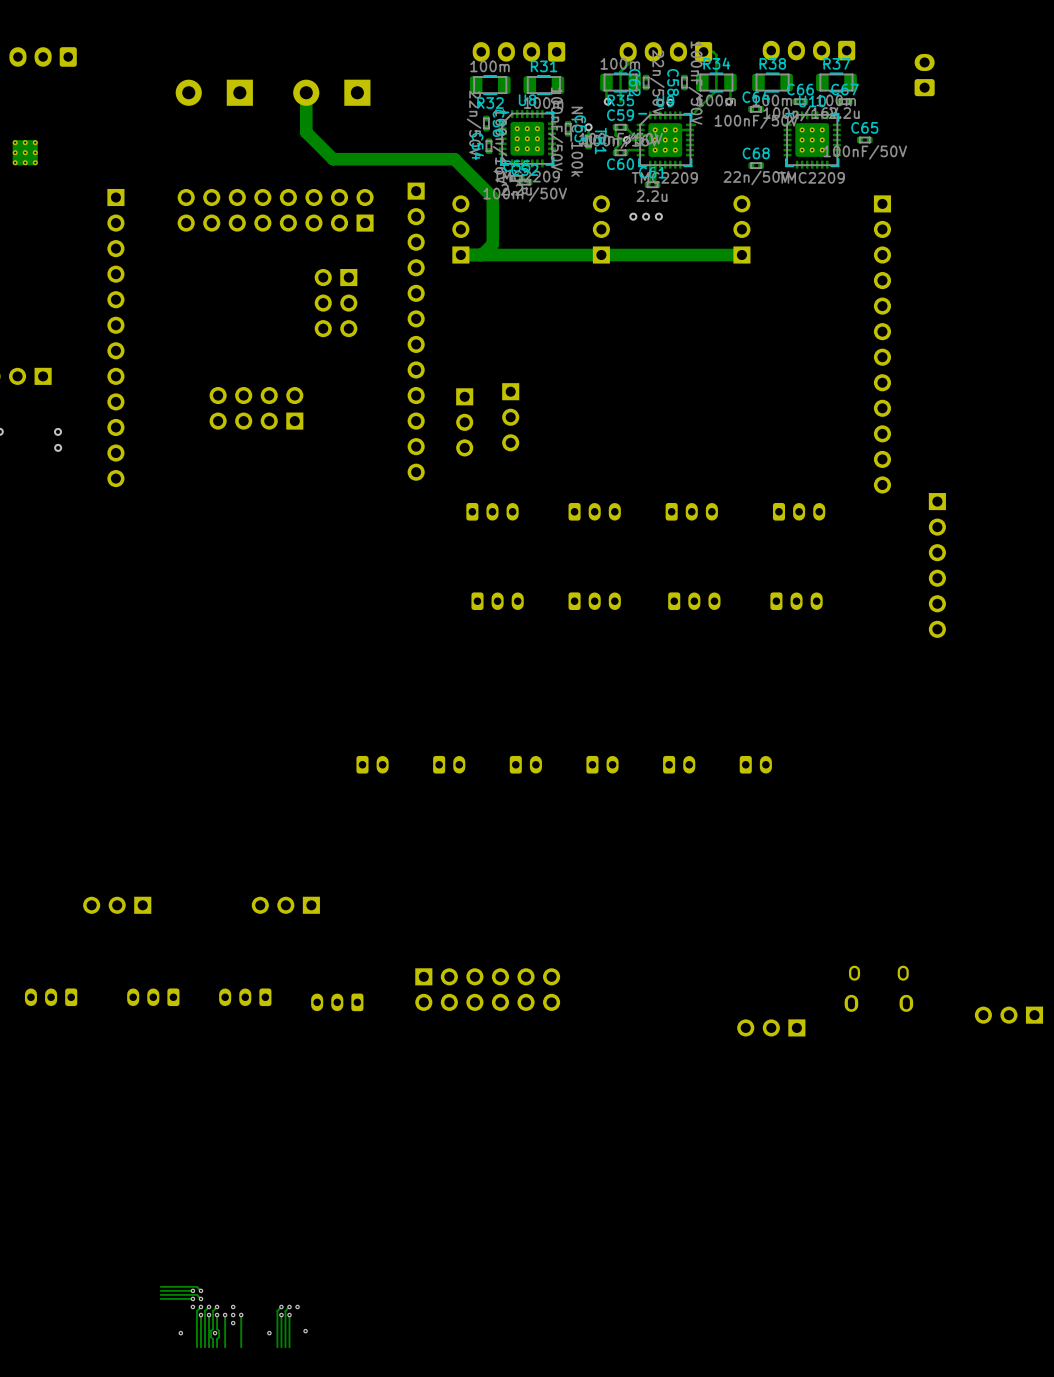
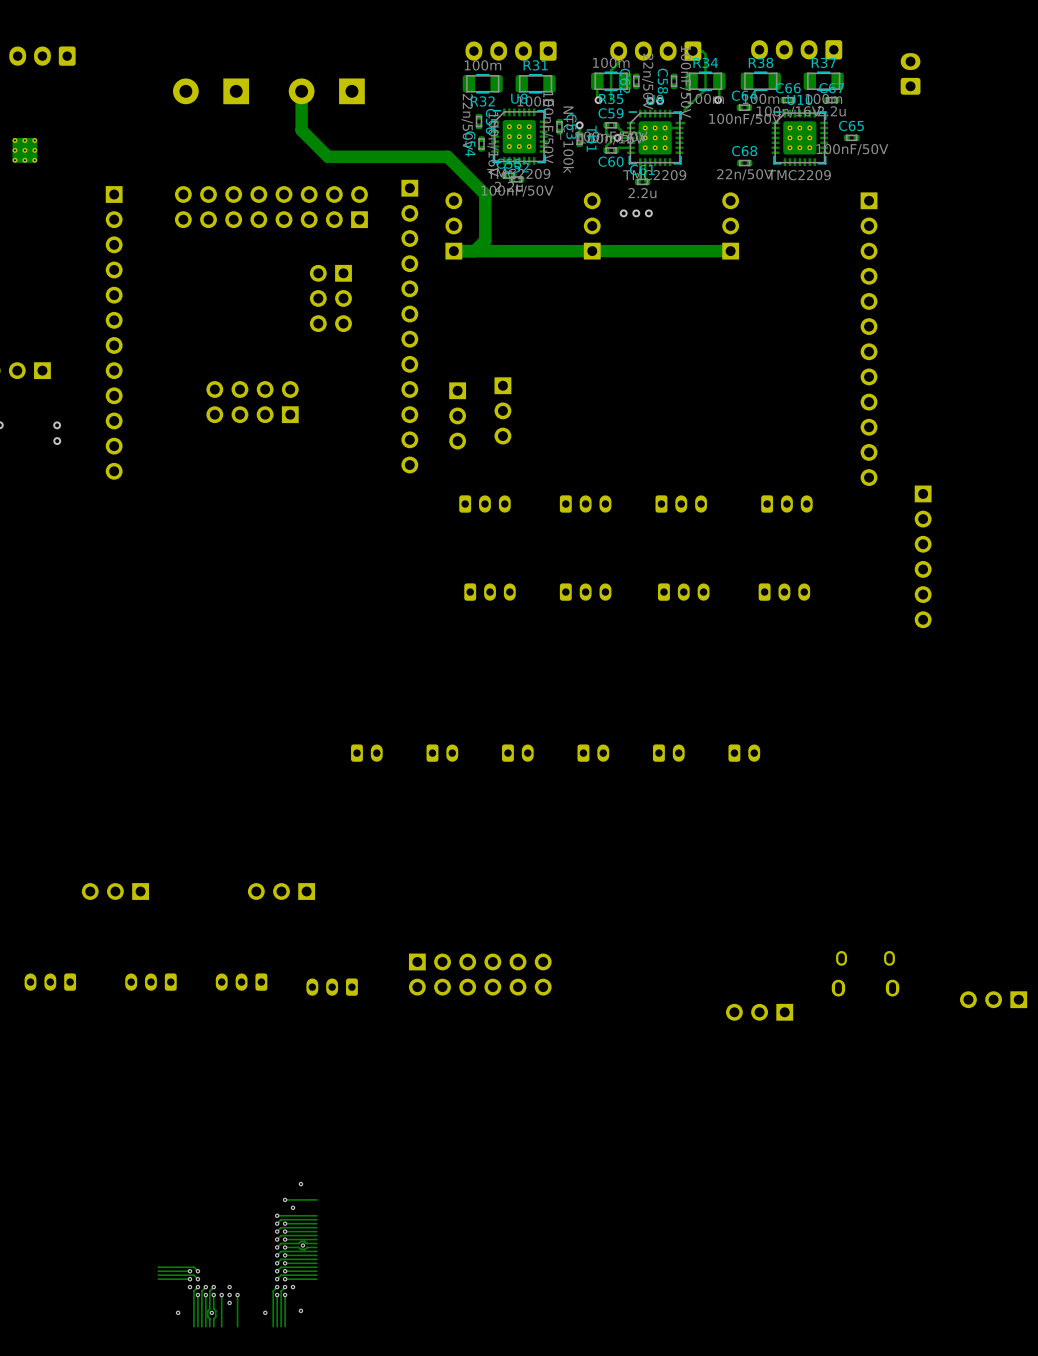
via: none -> (300, 1184)
via: none -> (285, 1199)
track: none -> (316, 1199) (285, 1199)
via: none -> (293, 1207)
via: none -> (277, 1215)
track: none -> (316, 1215) (277, 1215)
track: none -> (316, 1219) (281, 1219) (277, 1223)
via: none -> (277, 1223)
via: none -> (285, 1223)
track: none -> (316, 1223) (285, 1223)
track: none -> (316, 1227) (281, 1227) (277, 1231)
via: none -> (277, 1231)
via: none -> (285, 1231)
track: none -> (316, 1231) (285, 1231)
track: none -> (316, 1235) (281, 1235) (277, 1239)
via: none -> (277, 1239)
via: none -> (285, 1239)
track: none -> (316, 1239) (285, 1239)
track: none -> (316, 1243) (300, 1241) (298, 1243) (281, 1243) (277, 1247)
via: none -> (302, 1245)
via: none -> (277, 1247)
via: none -> (285, 1247)
track: none -> (316, 1247) (306, 1247) (304, 1249) (285, 1247)
track: none -> (316, 1251) (281, 1251) (277, 1255)
via: none -> (277, 1255)
via: none -> (285, 1255)
track: none -> (316, 1255) (285, 1255)
track: none -> (316, 1259) (281, 1259) (277, 1263)
via: none -> (277, 1263)
via: none -> (285, 1263)
track: none -> (316, 1263) (285, 1263)
track: none -> (316, 1267) (281, 1267) (277, 1271)
via: none -> (277, 1271)
via: none -> (285, 1271)
track: none -> (316, 1271) (285, 1271)
track: none -> (316, 1275) (281, 1275) (277, 1279)
via: none -> (277, 1279)
via: none -> (285, 1279)
track: none -> (316, 1279) (285, 1279)

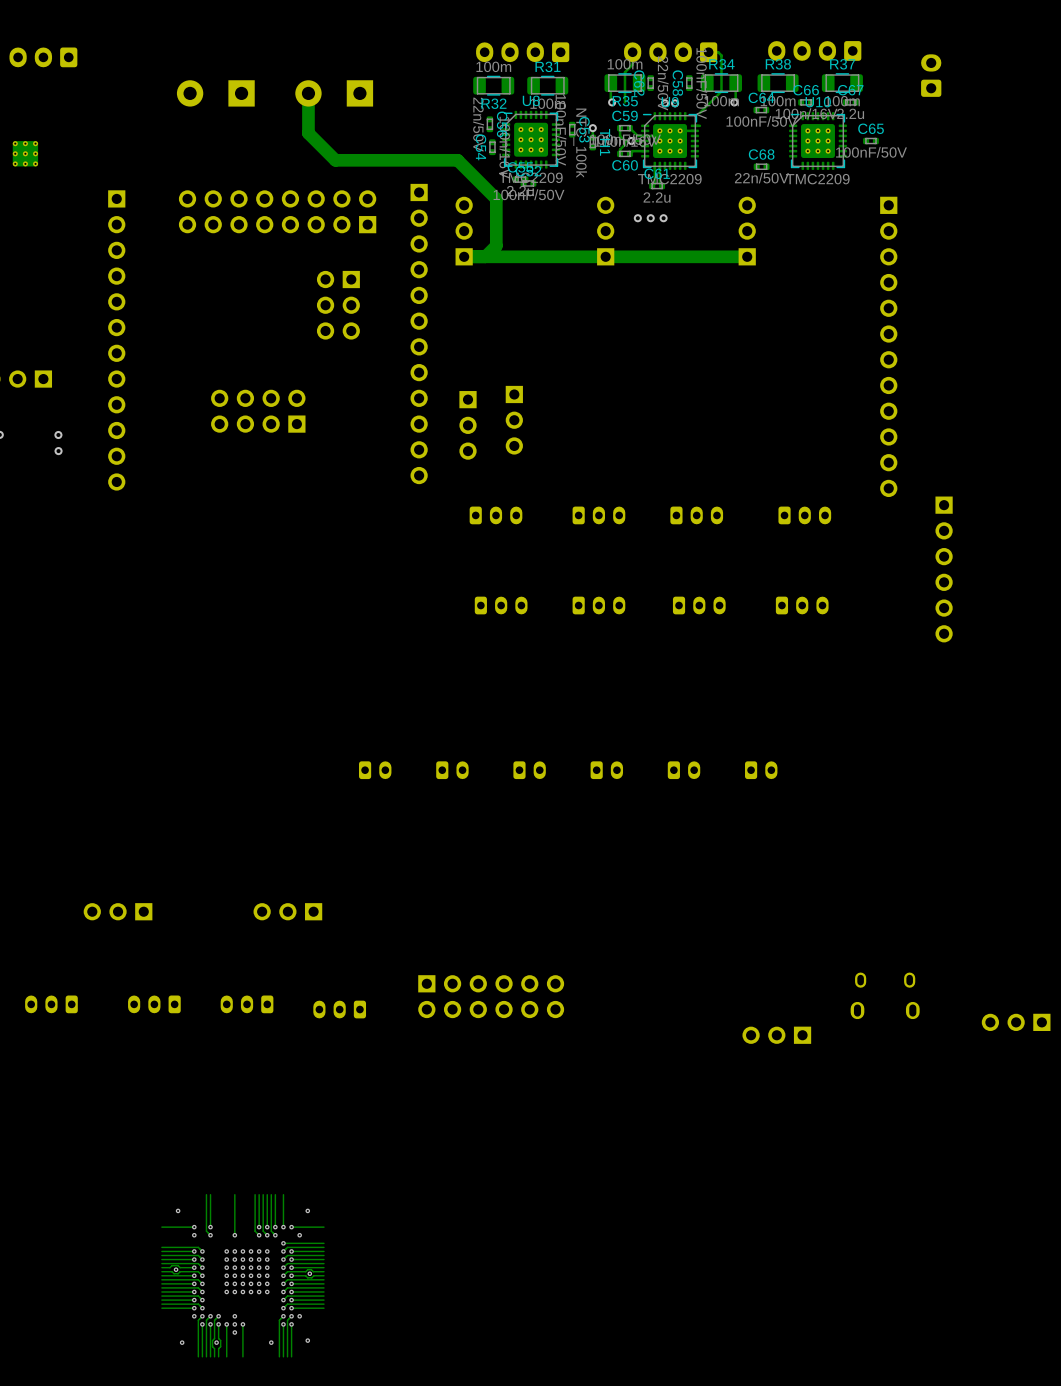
track: none -> (206, 1194) (206, 1231) (210, 1235)
track: none -> (210, 1194) (210, 1227)
track: none -> (234, 1194) (234, 1235)
track: none -> (255, 1194) (255, 1231) (259, 1235)
track: none -> (259, 1194) (259, 1227)
track: none -> (263, 1194) (263, 1231) (267, 1235)
track: none -> (267, 1194) (267, 1227)
track: none -> (271, 1194) (271, 1231) (275, 1235)
track: none -> (275, 1194) (275, 1227)
track: none -> (283, 1194) (283, 1227)
via: none -> (178, 1210)
track: none -> (194, 1227) (161, 1227)
via: none -> (194, 1227)
via: none -> (210, 1227)
via: none -> (259, 1227)
via: none -> (267, 1227)
via: none -> (275, 1227)
via: none -> (283, 1227)
via: none -> (194, 1235)
via: none -> (210, 1235)
via: none -> (234, 1235)
via: none -> (259, 1235)
via: none -> (267, 1235)
via: none -> (275, 1235)
track: none -> (161, 1247) (198, 1247) (202, 1251)
track: none -> (194, 1251) (161, 1251)
via: none -> (194, 1251)
via: none -> (202, 1251)
via: none -> (226, 1251)
via: none -> (234, 1251)
via: none -> (242, 1251)
via: none -> (251, 1251)
via: none -> (259, 1251)
via: none -> (267, 1251)
track: none -> (161, 1255) (198, 1255) (202, 1259)
track: none -> (194, 1259) (161, 1259)
via: none -> (194, 1259)
via: none -> (202, 1259)
via: none -> (226, 1259)
via: none -> (234, 1259)
via: none -> (242, 1259)
via: none -> (251, 1259)
via: none -> (259, 1259)
via: none -> (267, 1259)
track: none -> (161, 1263) (198, 1263) (202, 1267)
track: none -> (194, 1267) (180, 1267) (178, 1265) (161, 1267)
via: none -> (194, 1267)
via: none -> (202, 1267)
via: none -> (226, 1267)
via: none -> (234, 1267)
via: none -> (242, 1267)
via: none -> (251, 1267)
via: none -> (259, 1267)
via: none -> (267, 1267)
via: none -> (176, 1269)
track: none -> (161, 1271) (172, 1271) (174, 1273) (180, 1271) (198, 1271) (202, 1275)
track: none -> (194, 1275) (161, 1275)
via: none -> (194, 1275)
via: none -> (202, 1275)
via: none -> (226, 1275)
via: none -> (234, 1275)
via: none -> (242, 1275)
via: none -> (251, 1275)
via: none -> (259, 1275)
via: none -> (267, 1275)
track: none -> (161, 1279) (198, 1279) (202, 1283)
track: none -> (194, 1283) (161, 1283)
via: none -> (194, 1283)
via: none -> (202, 1283)
via: none -> (226, 1283)
via: none -> (234, 1283)
via: none -> (242, 1283)
via: none -> (251, 1283)
via: none -> (259, 1283)
via: none -> (267, 1283)
track: none -> (161, 1287) (198, 1287) (202, 1291)
track: none -> (194, 1291) (161, 1291)
via: none -> (194, 1291)
via: none -> (202, 1291)
via: none -> (226, 1291)
via: none -> (234, 1291)
via: none -> (242, 1291)
via: none -> (251, 1291)
via: none -> (259, 1291)
via: none -> (267, 1291)

